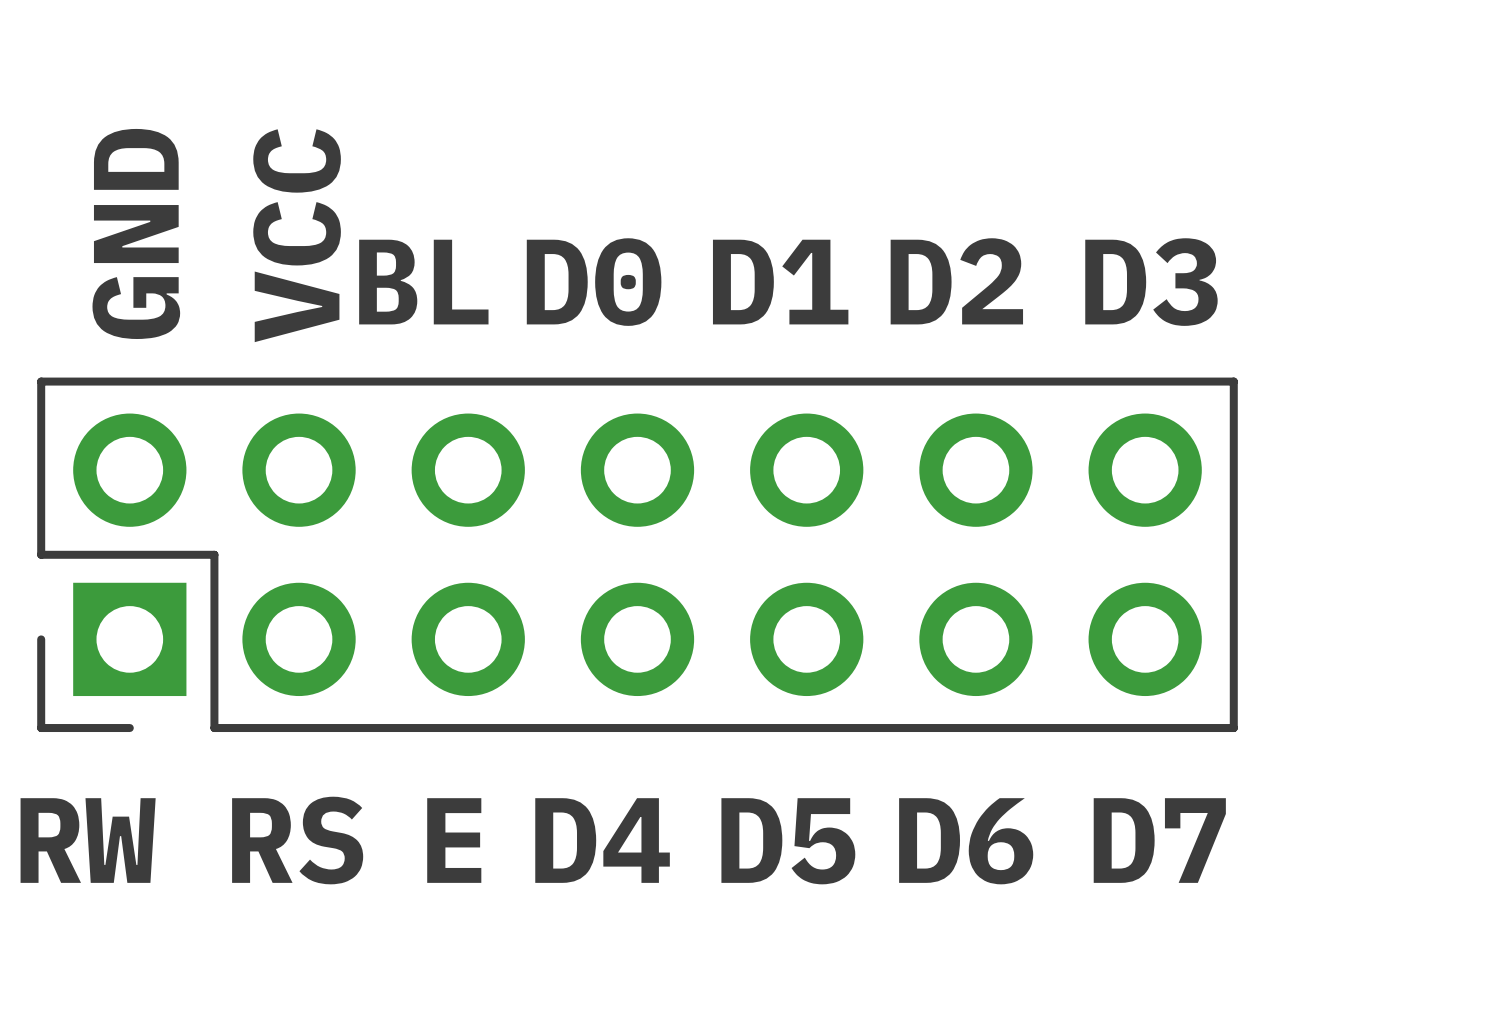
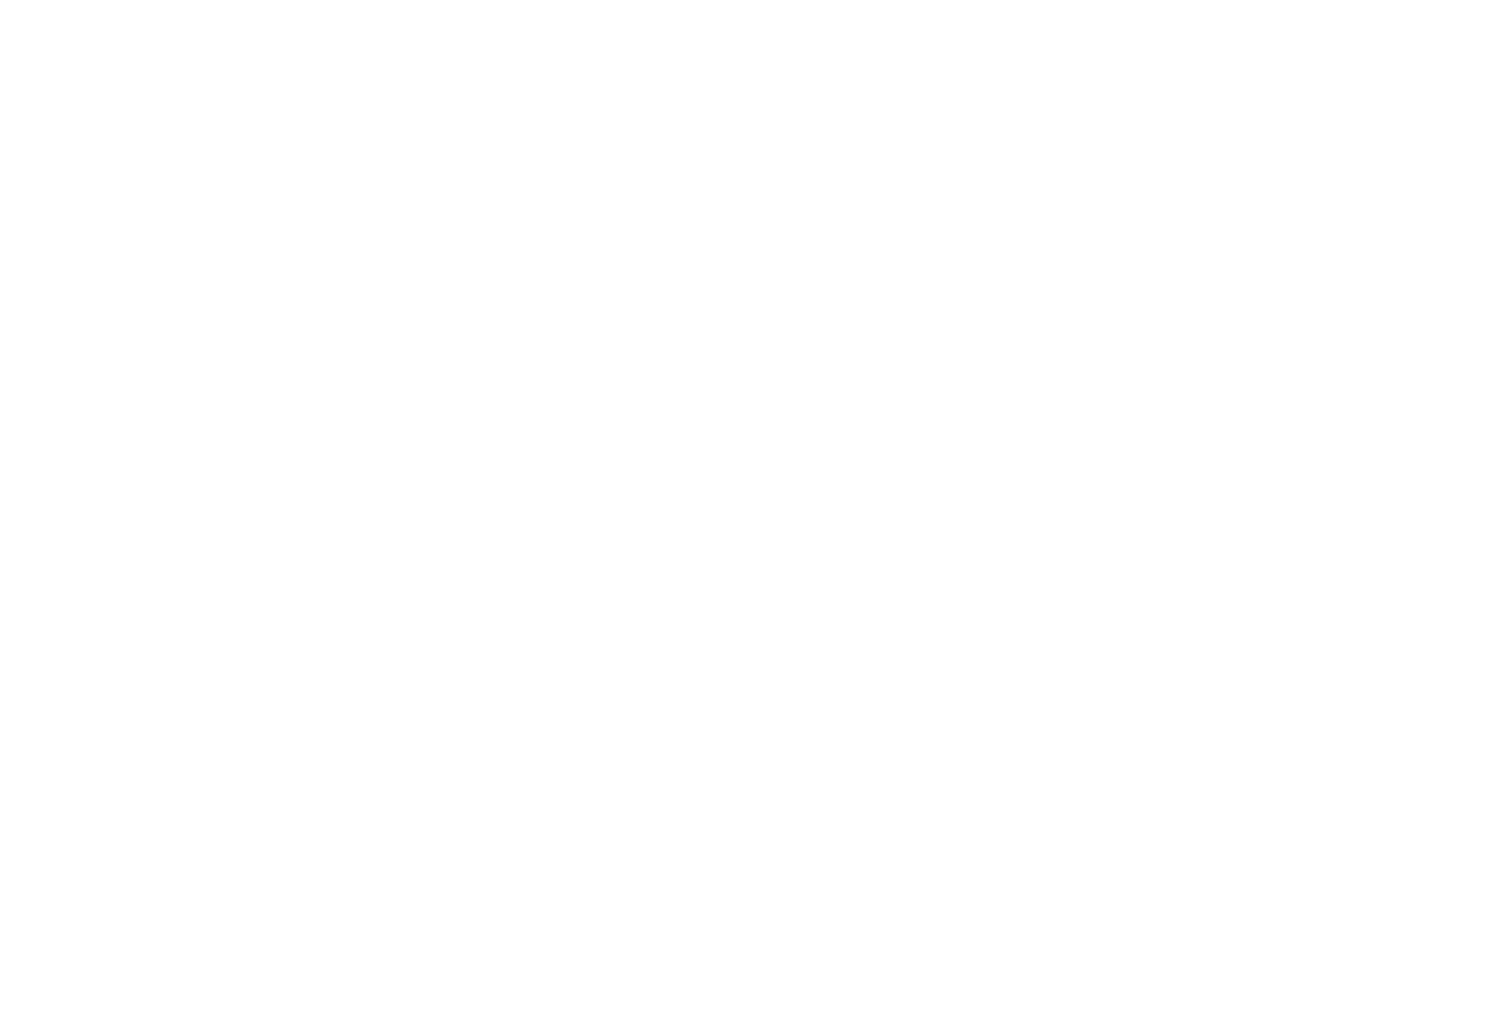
text: GND (136, 233) -> none
text: VCC (297, 235) -> none
text: D2 (956, 281) -> none
text: BL (423, 282) -> none
text: D0 (594, 282) -> none
text: D1 (780, 282) -> none
text: D3 (1151, 282) -> none
part: (637, 554) -> none
text: RW (88, 840) -> none
text: RS (297, 840) -> none
text: E (454, 840) -> none
text: D4 (602, 840) -> none
text: D7 (1159, 840) -> none
text: D5 (788, 841) -> none
text: D6 (966, 841) -> none

